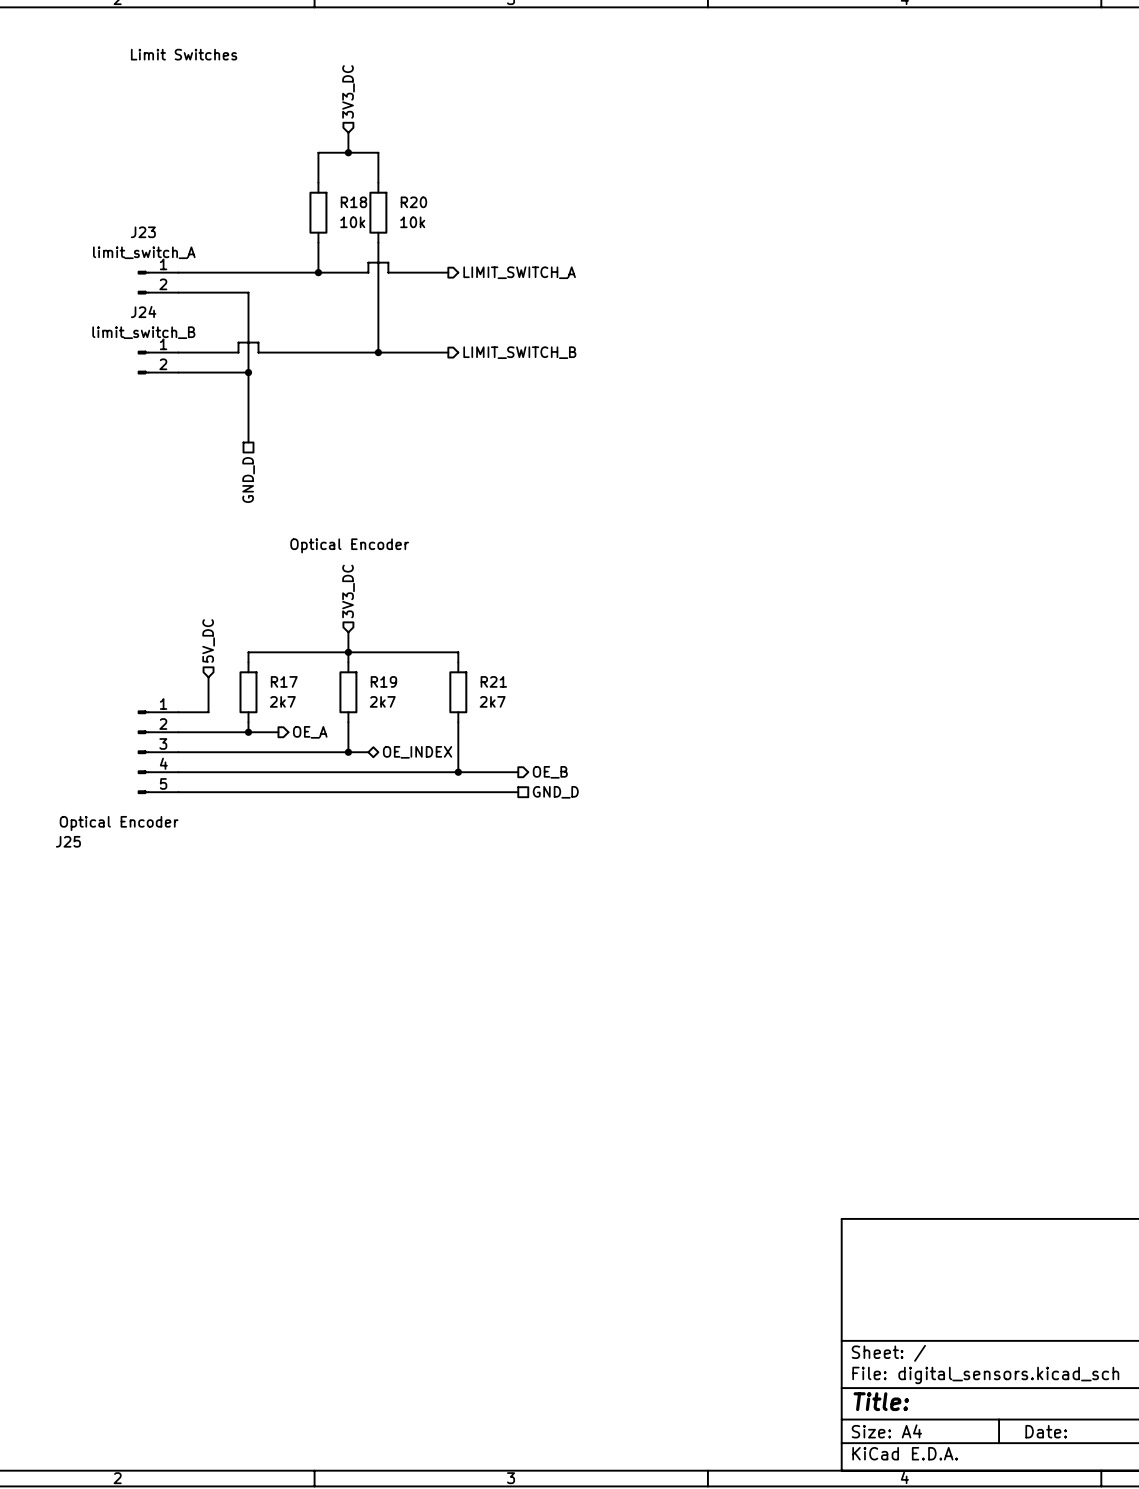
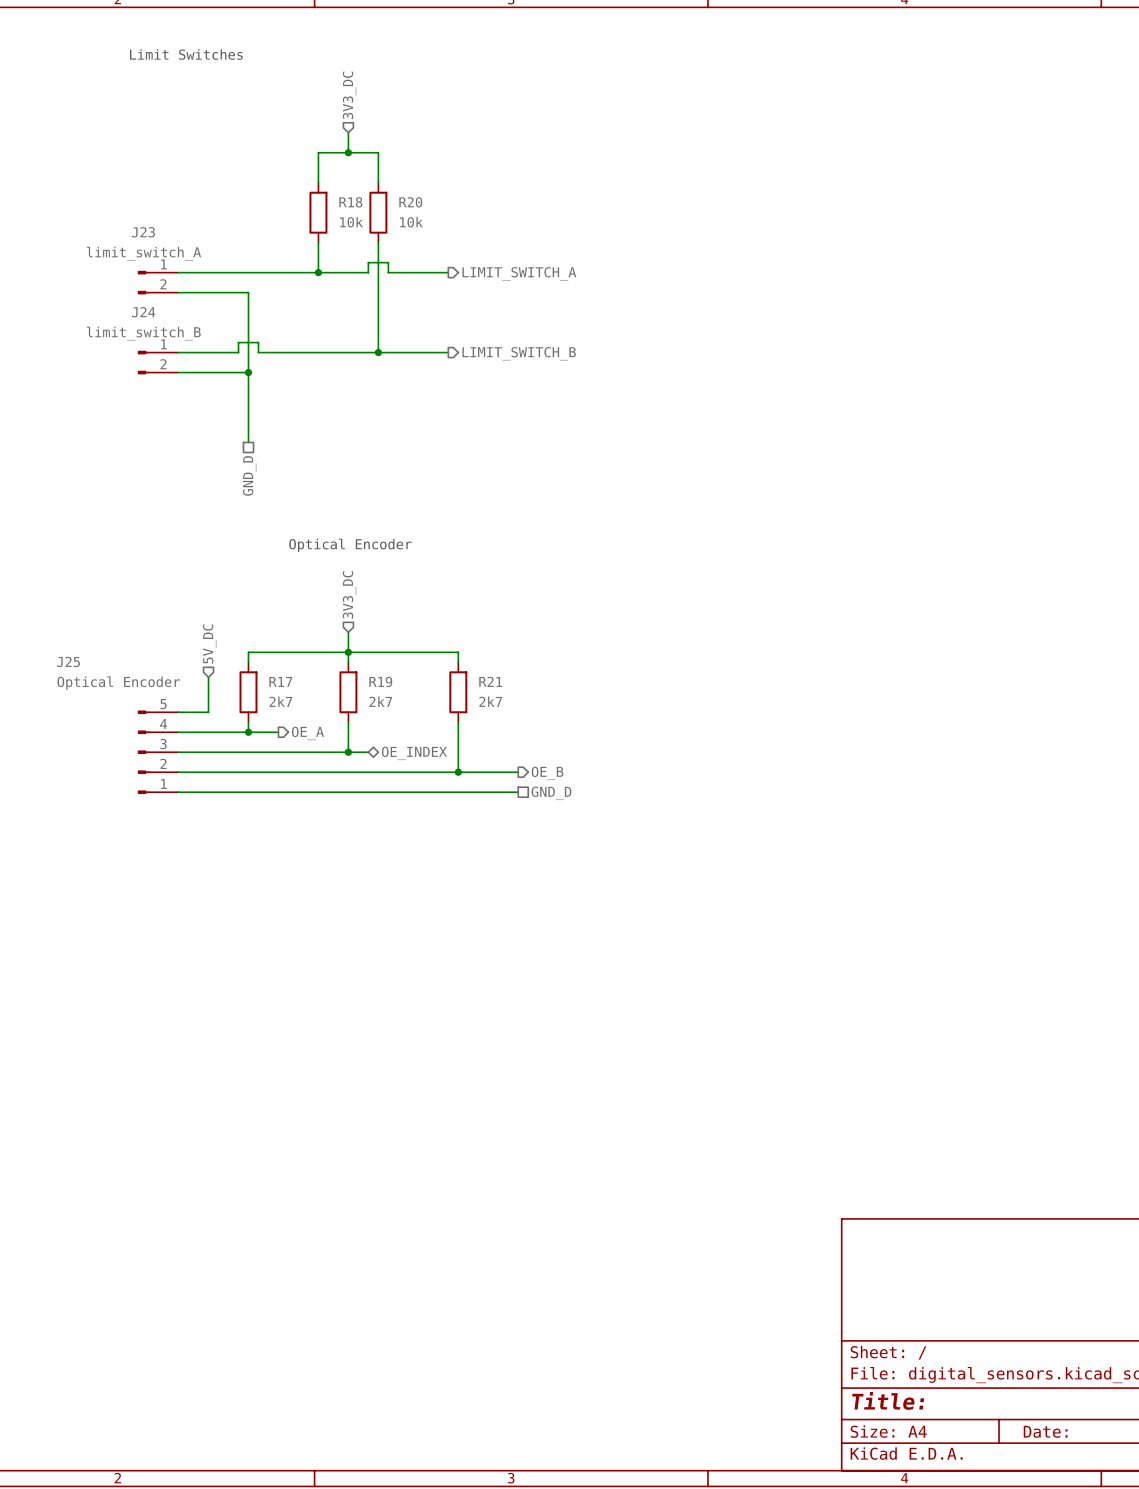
J25 flip: as is (143, 752) -> up-down (143, 752)

